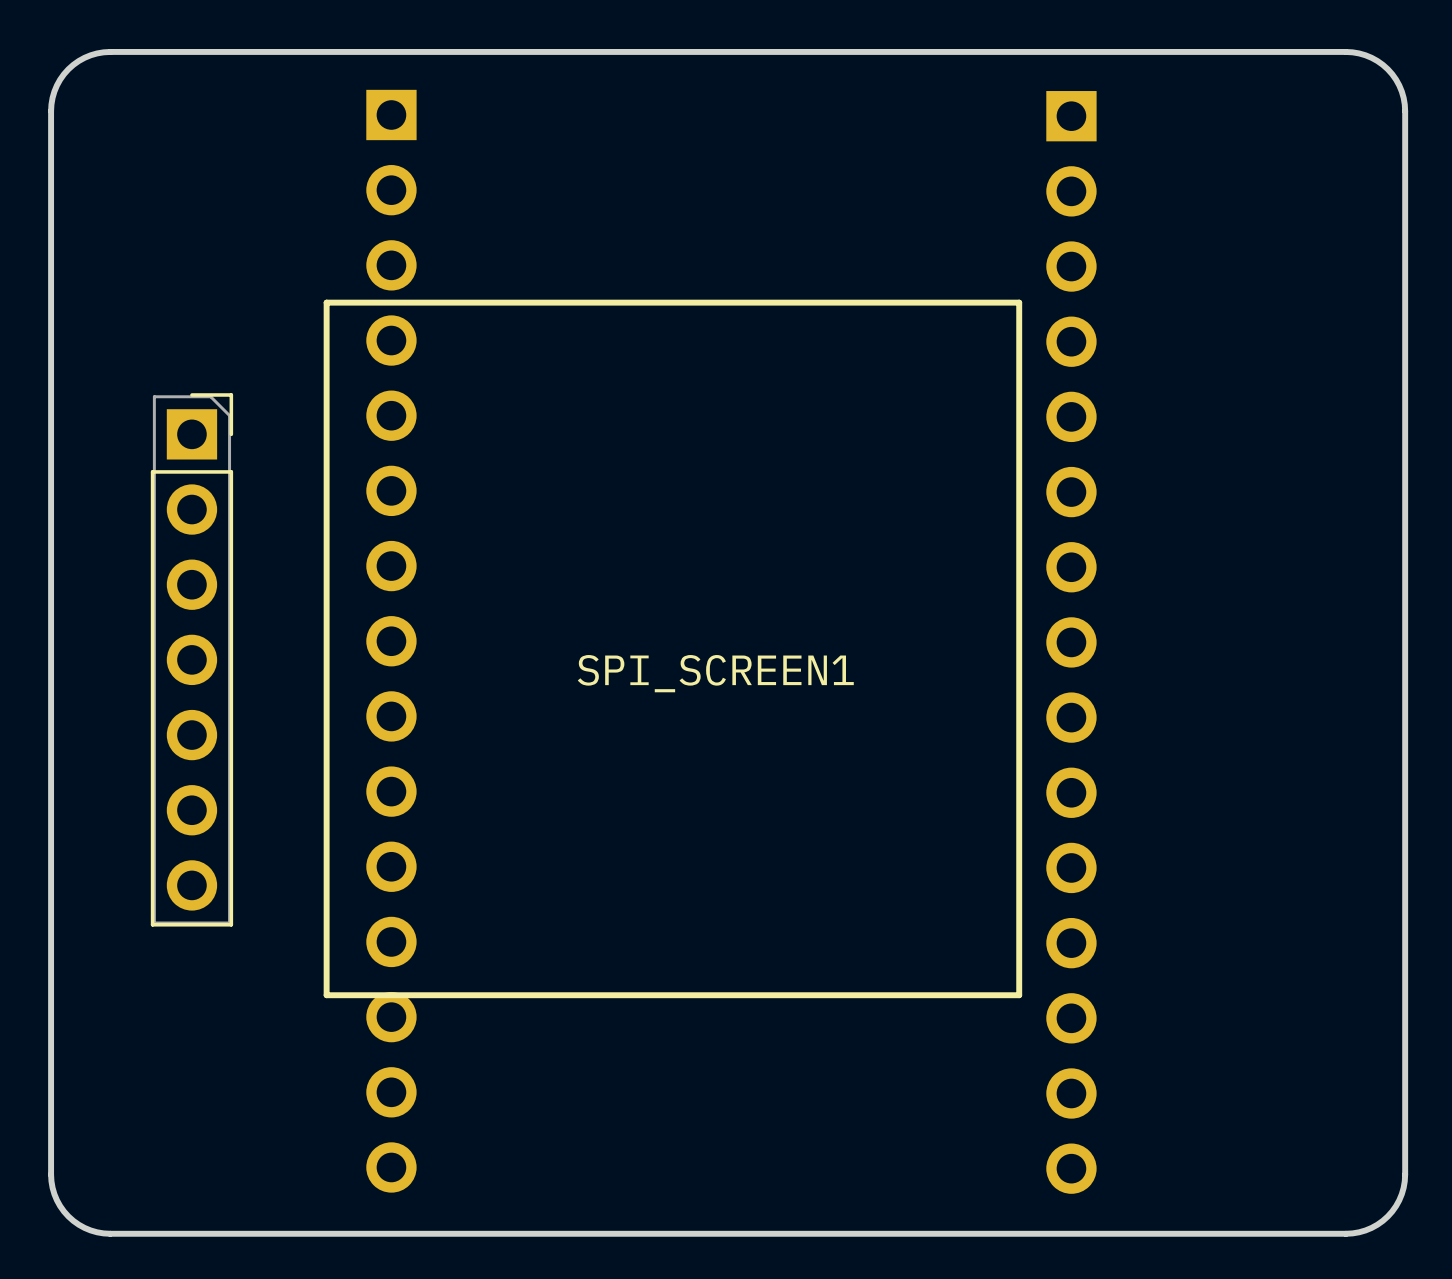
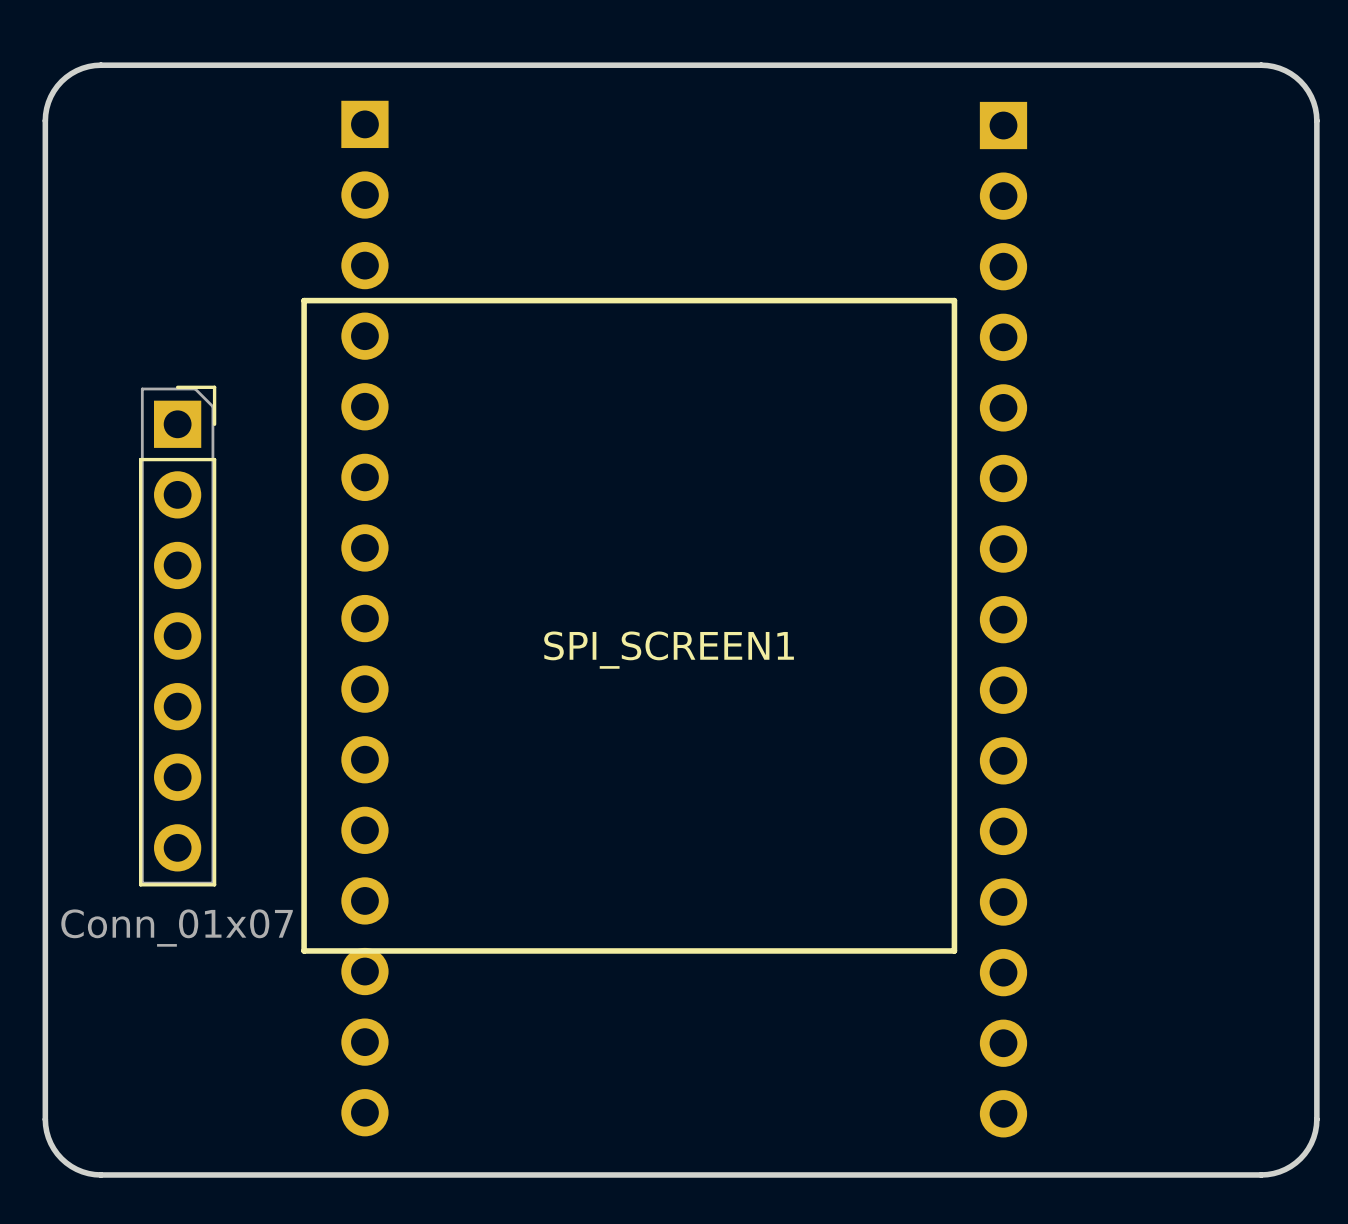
SPI_SCREEN1 value: none -> Conn_01x07 (177, 928)

